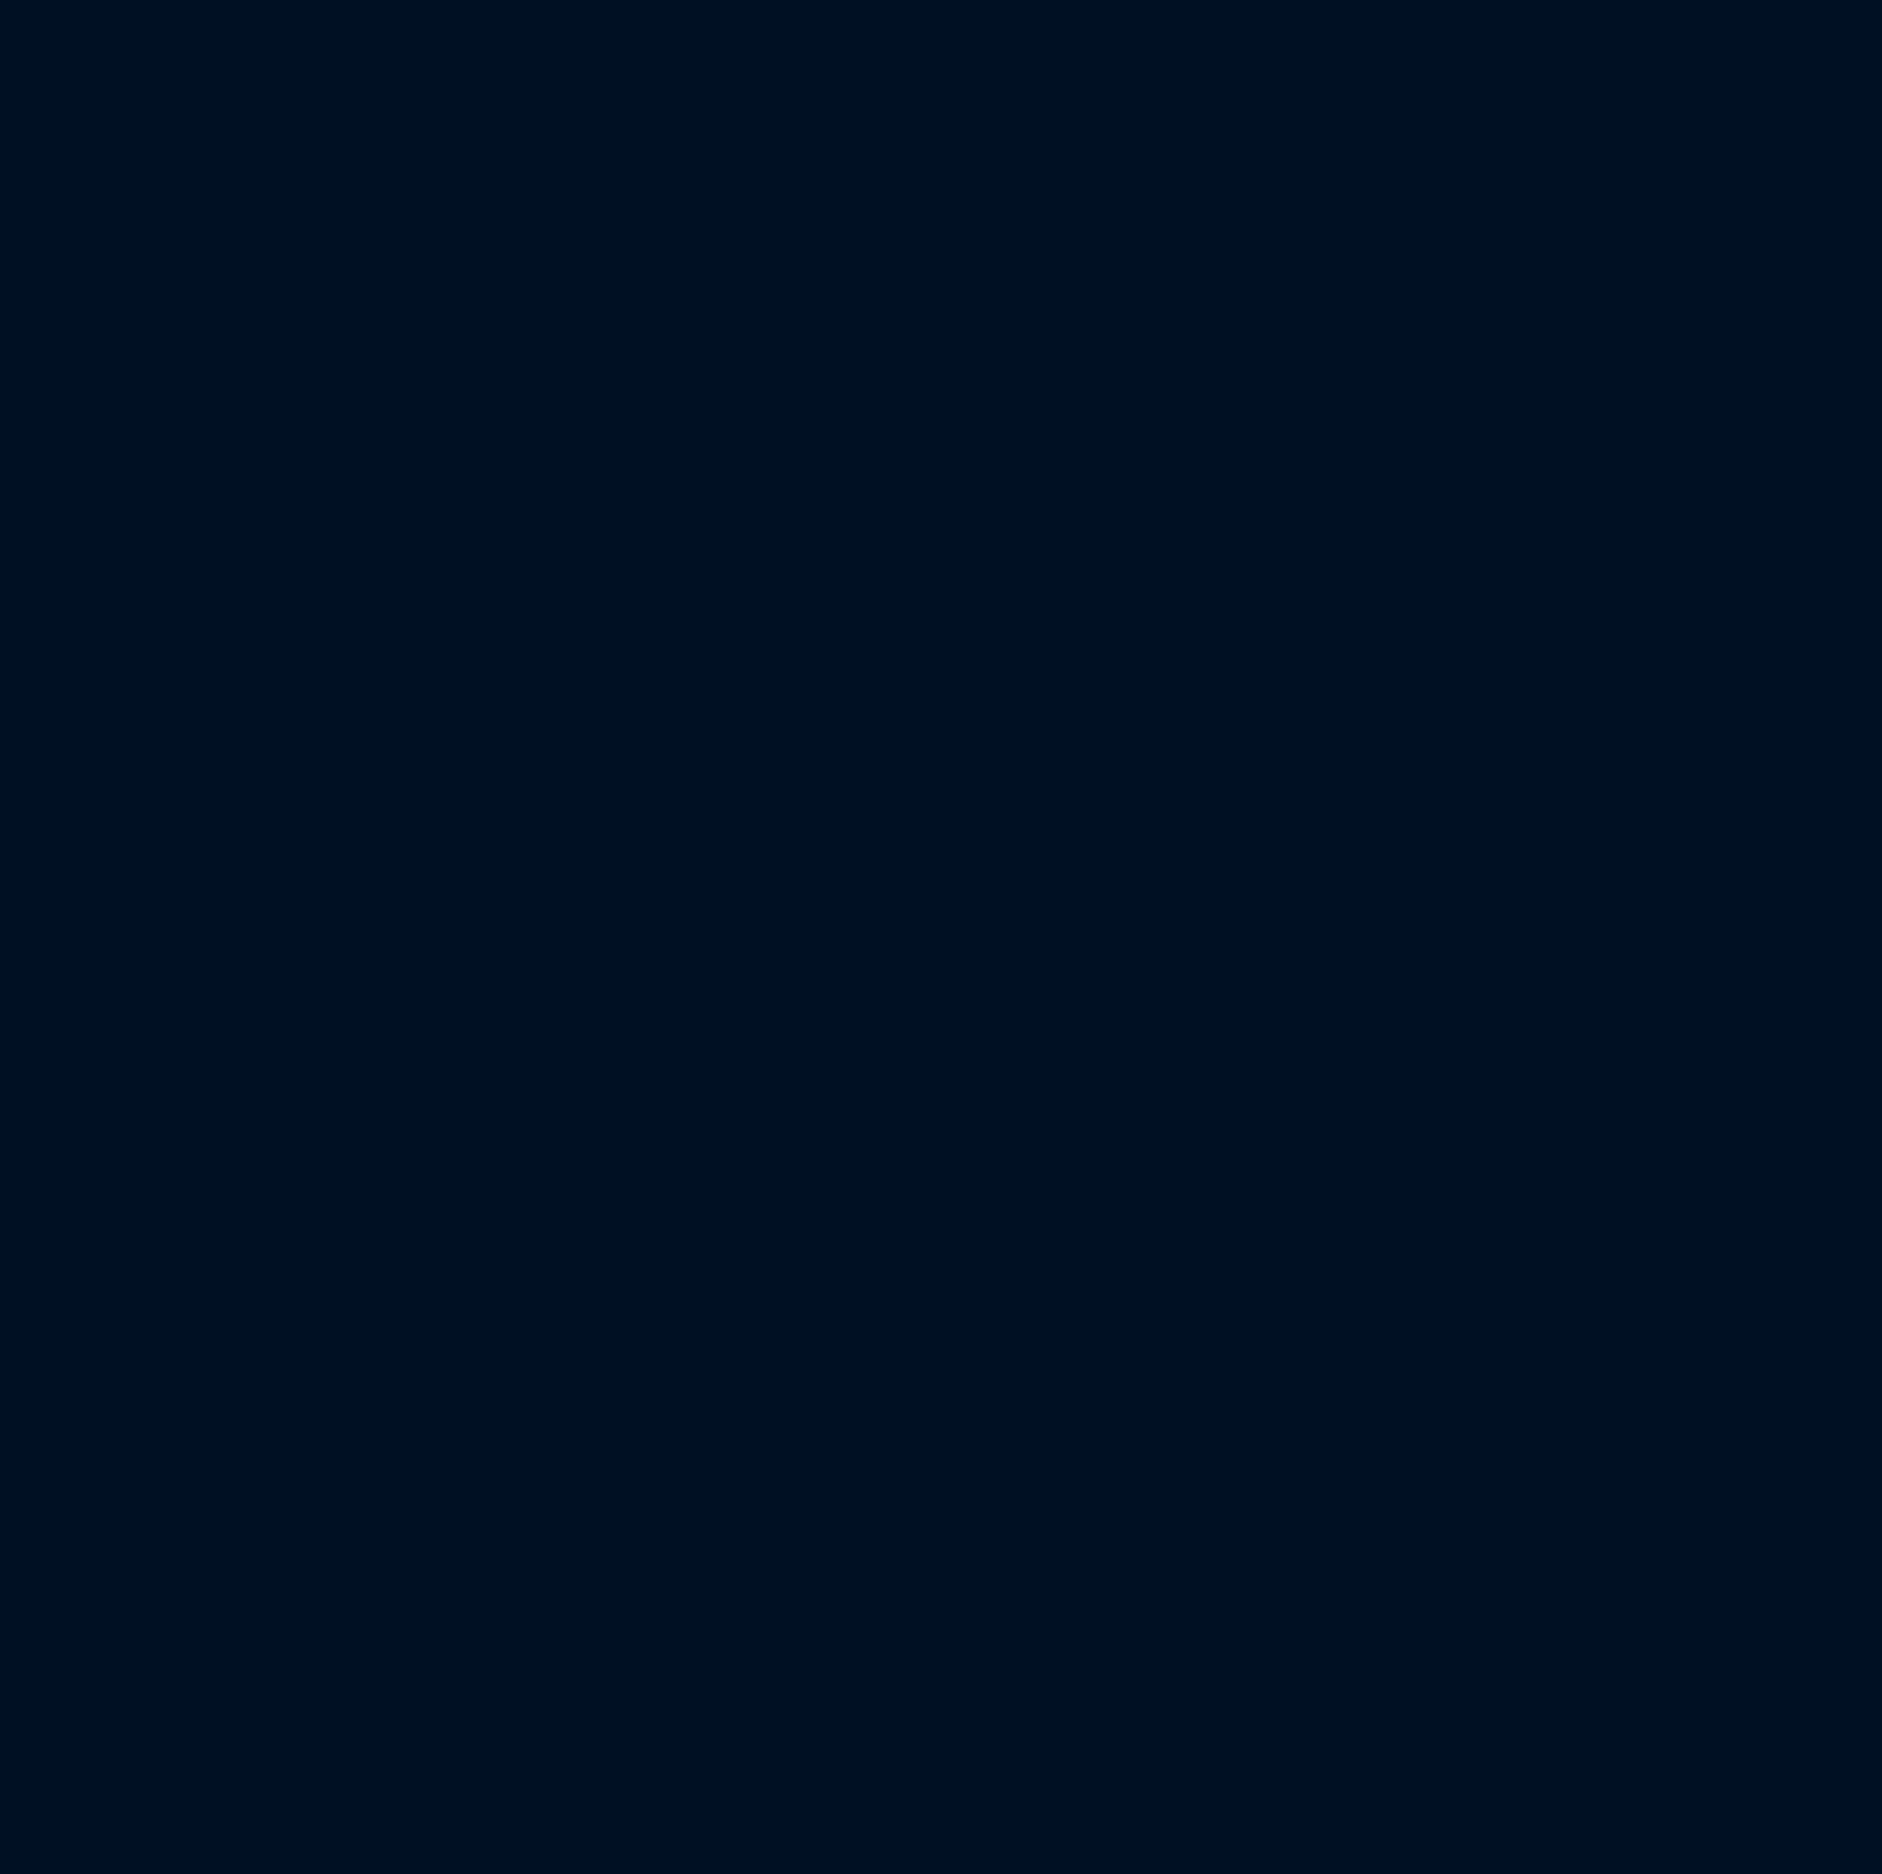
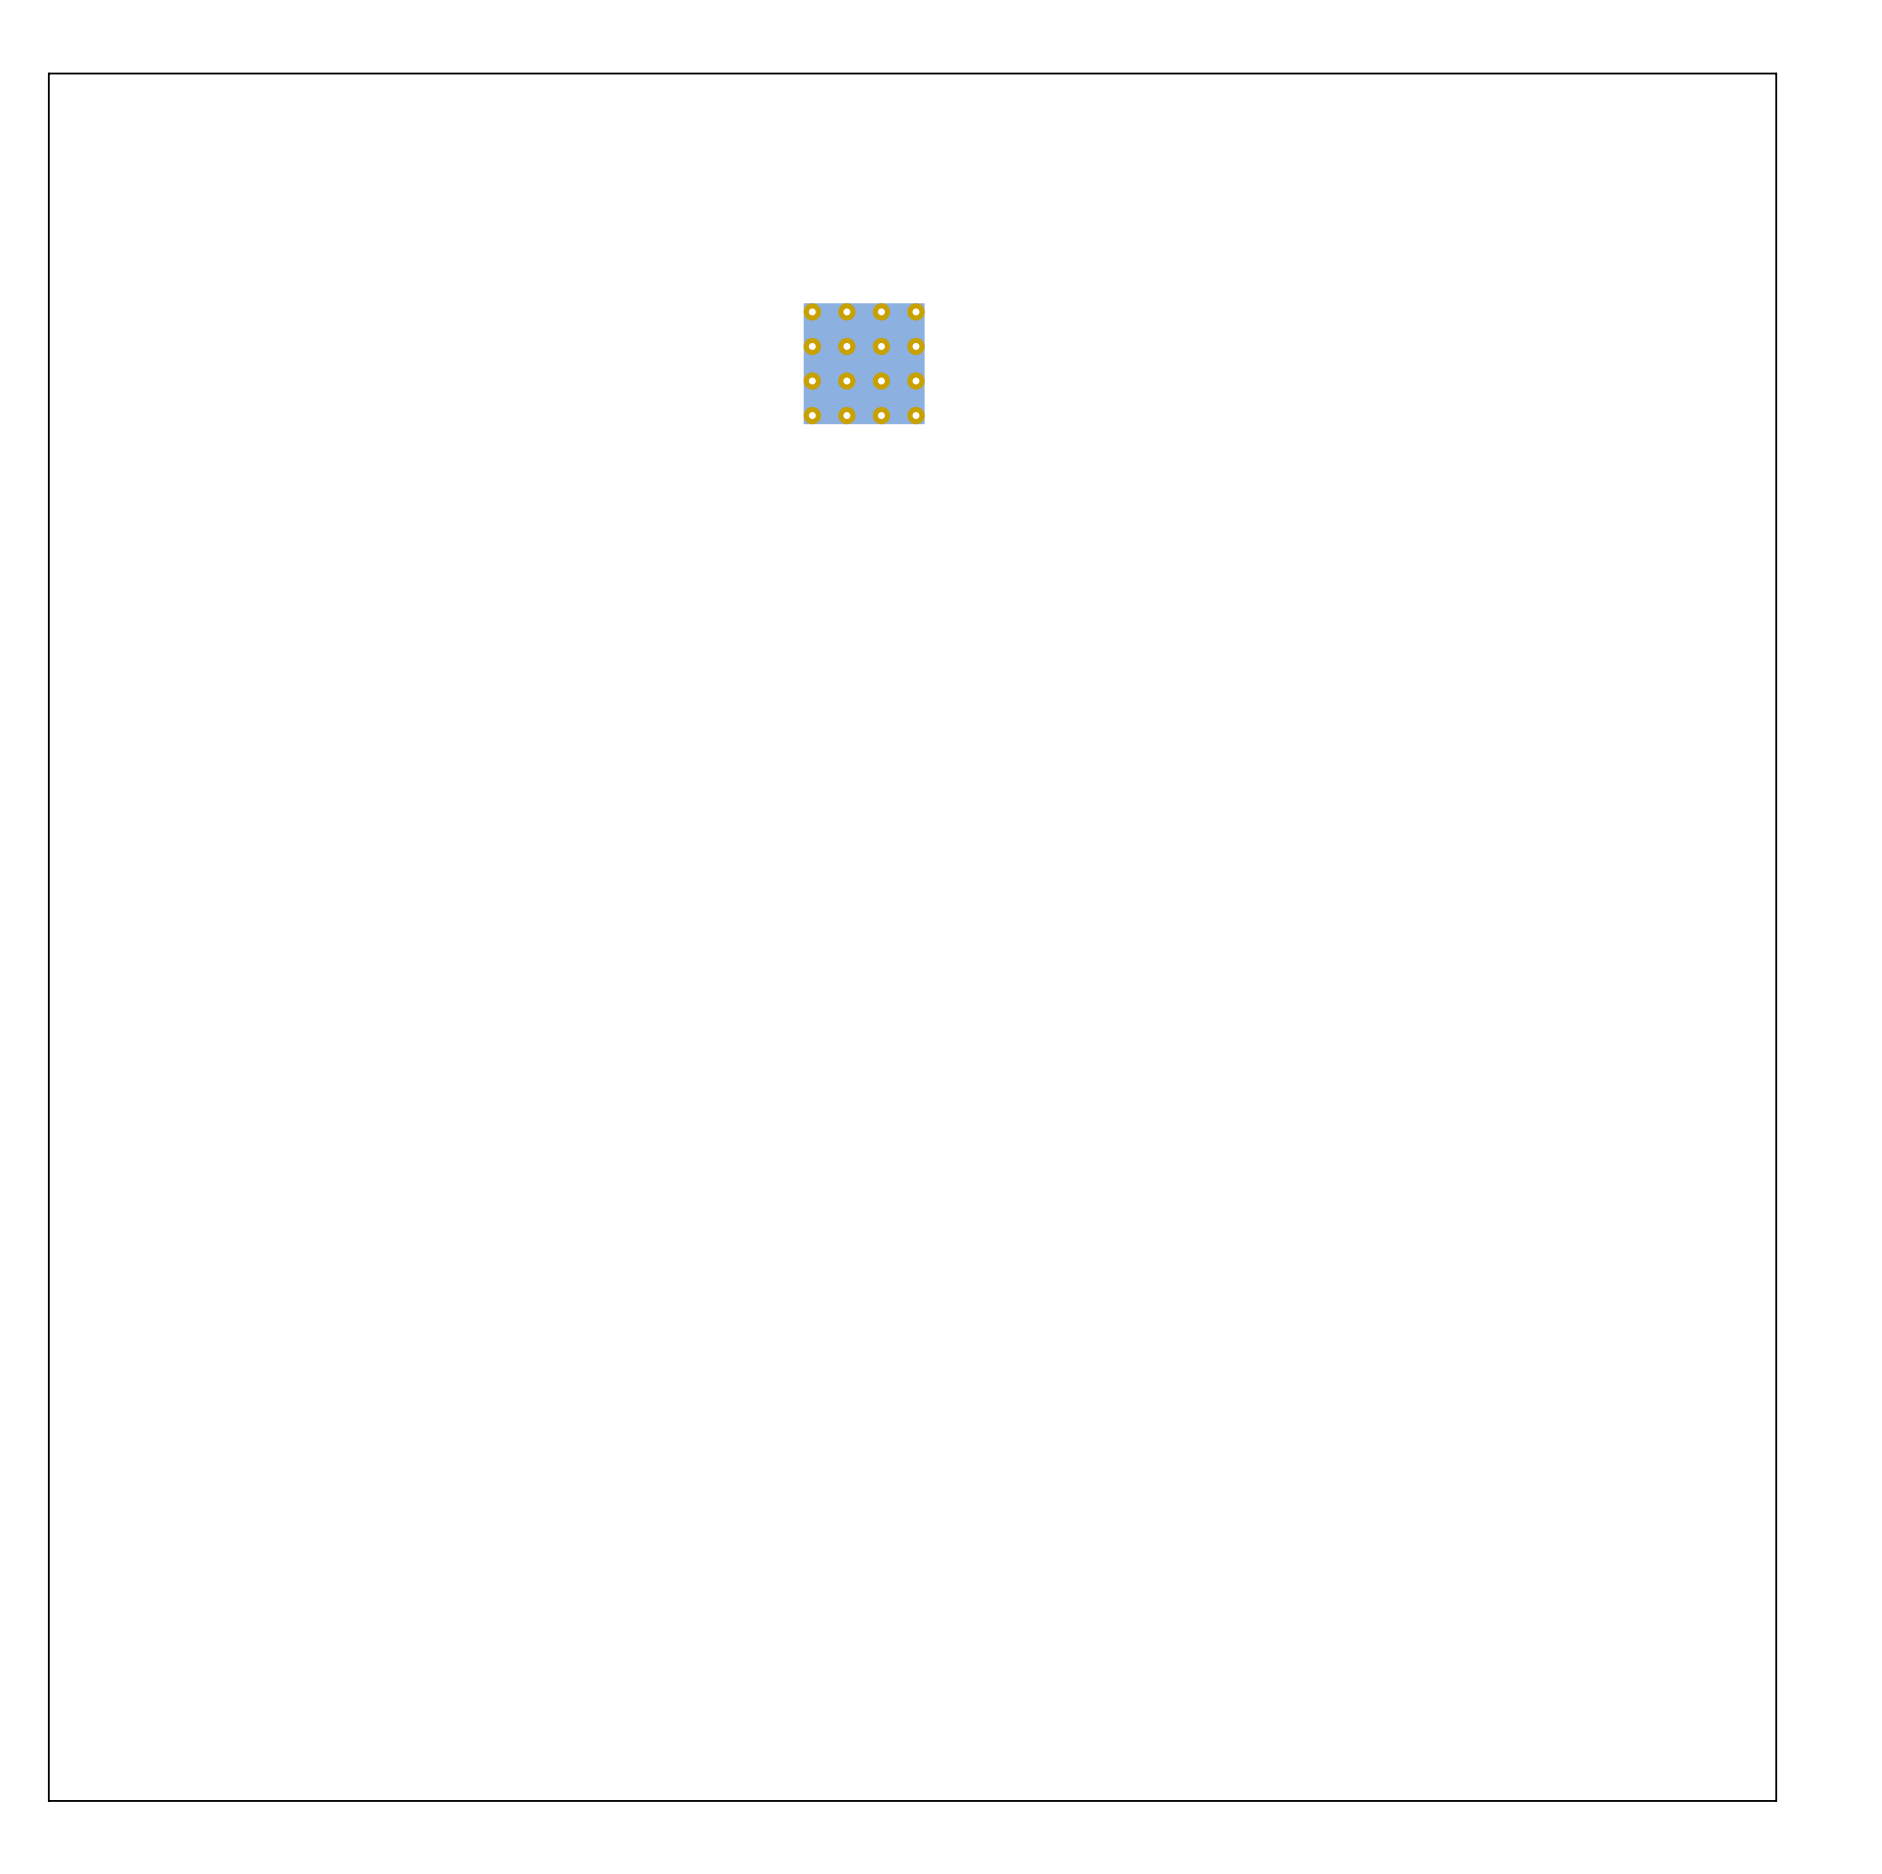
board edge: none -> (1776, 73) (48, 73) (48, 1800) (1776, 1800) (1776, 73)
part: none -> (864, 363)

